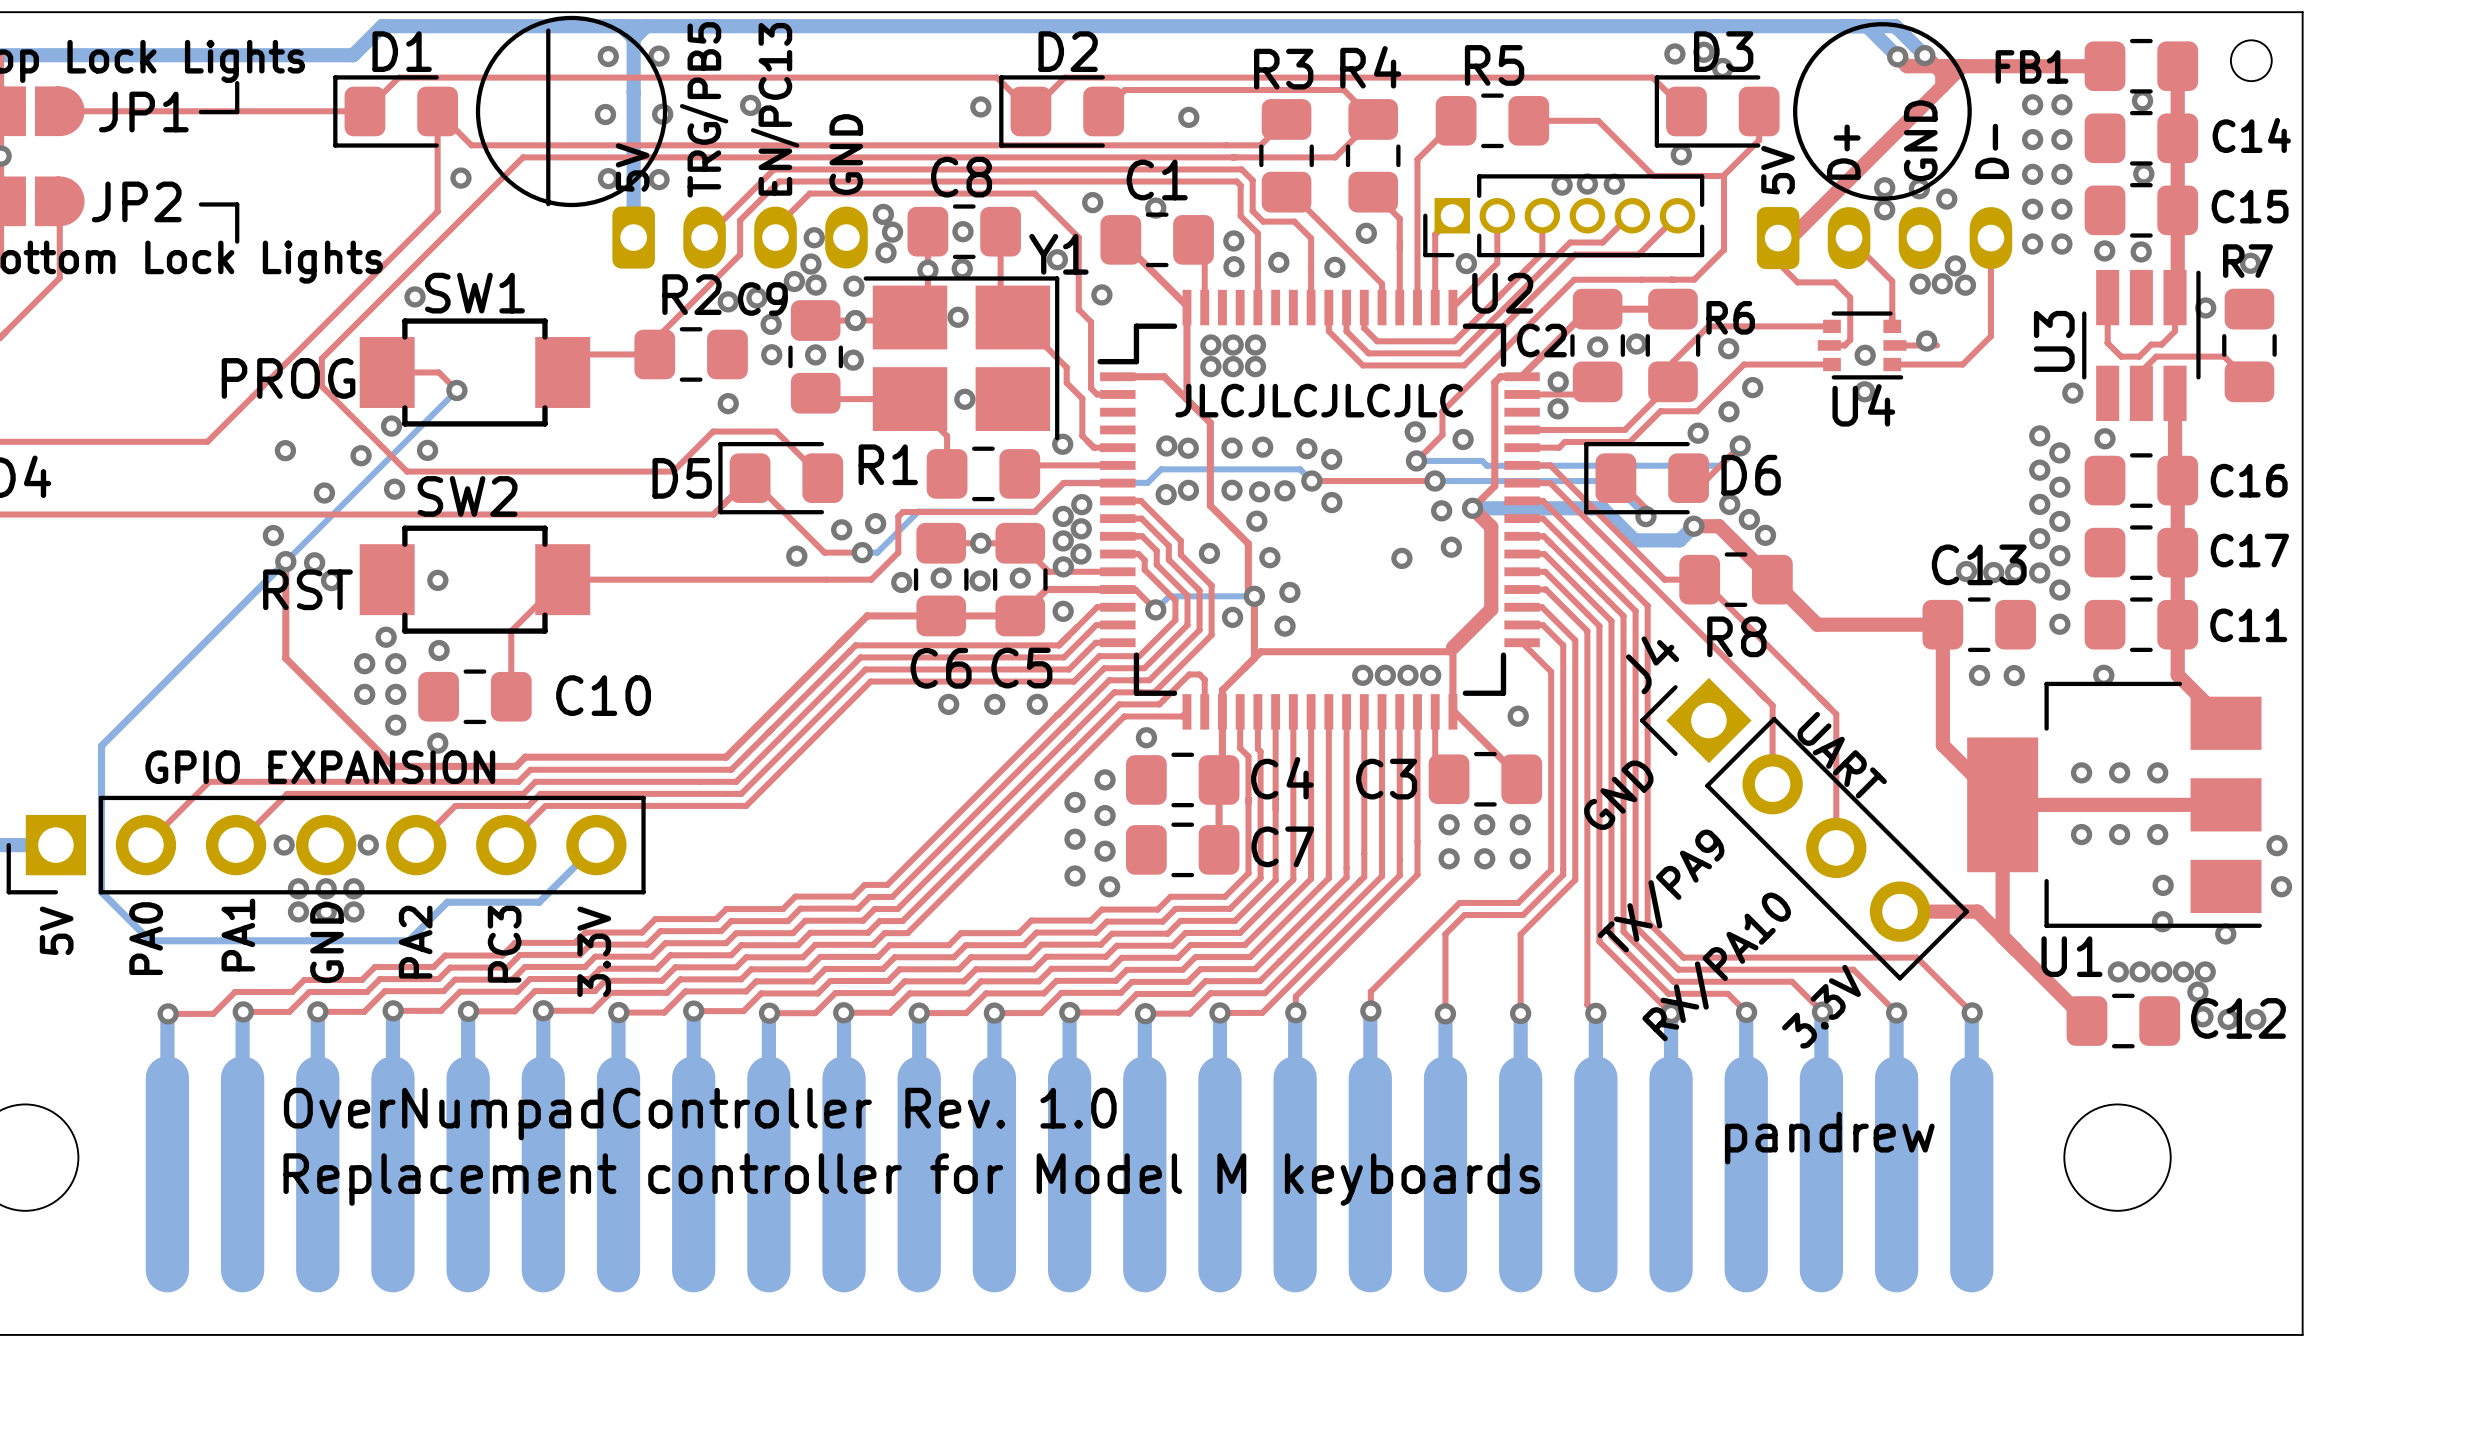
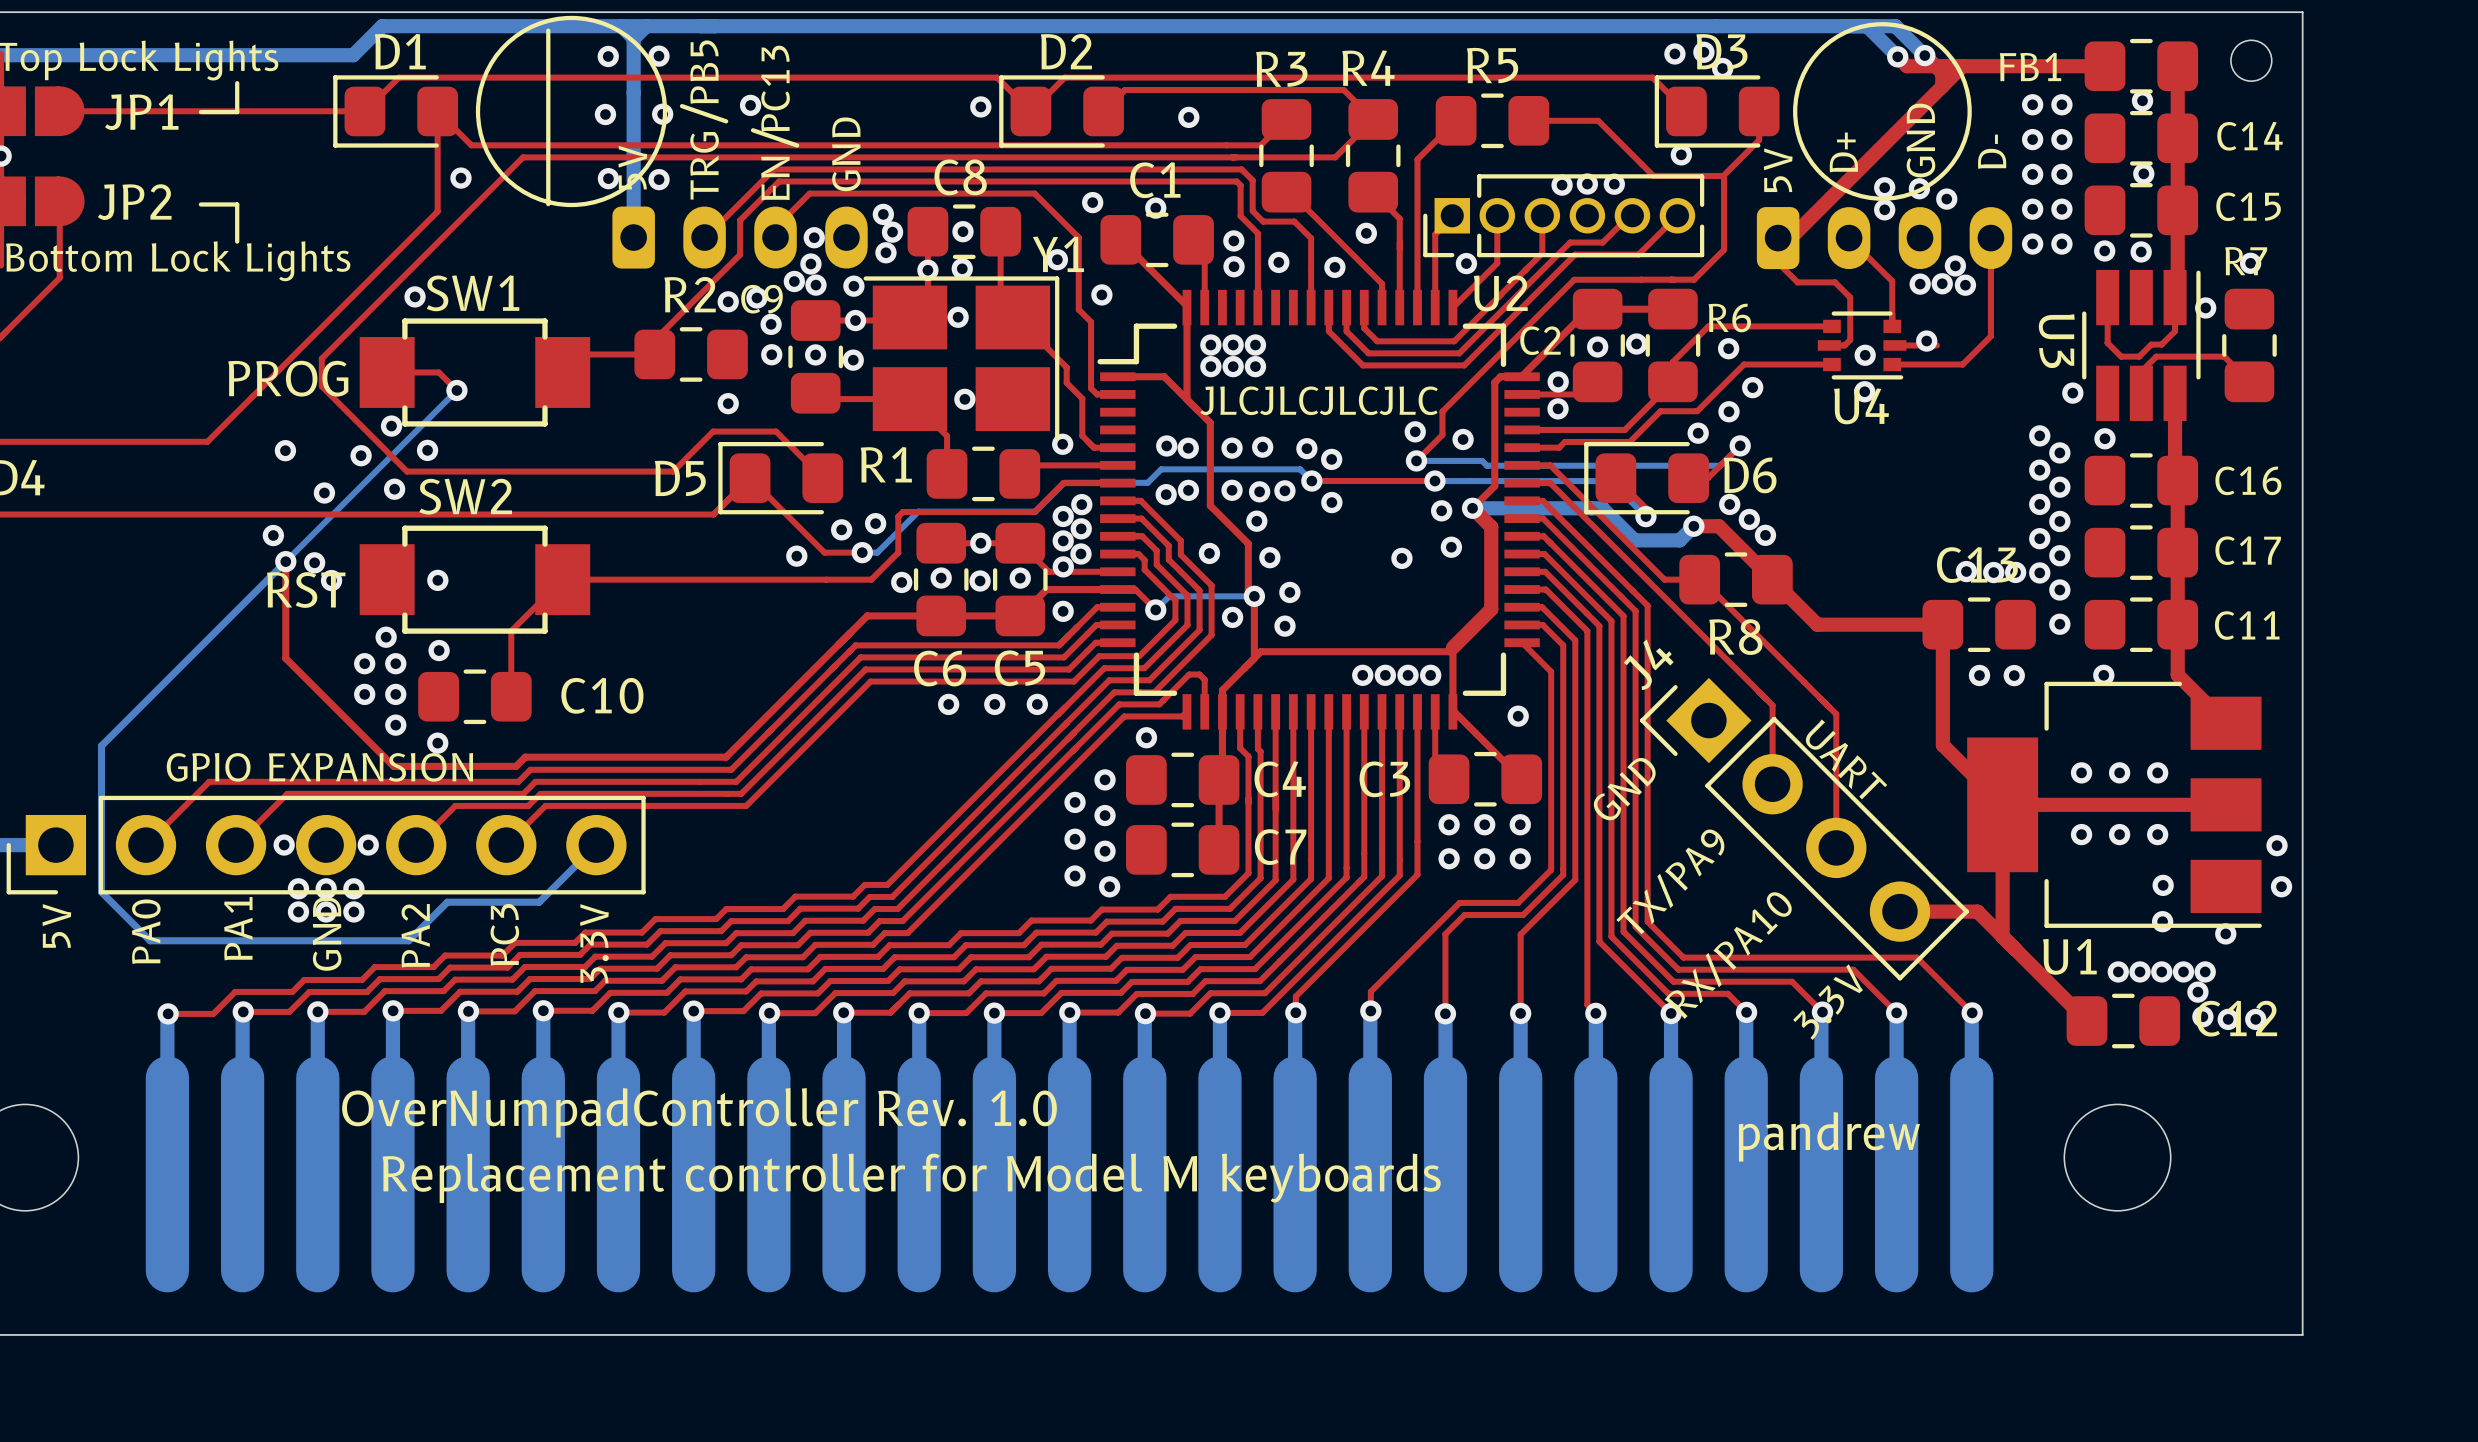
U3 name rotation: 0° (2054, 341) -> 180° (2056, 341)

